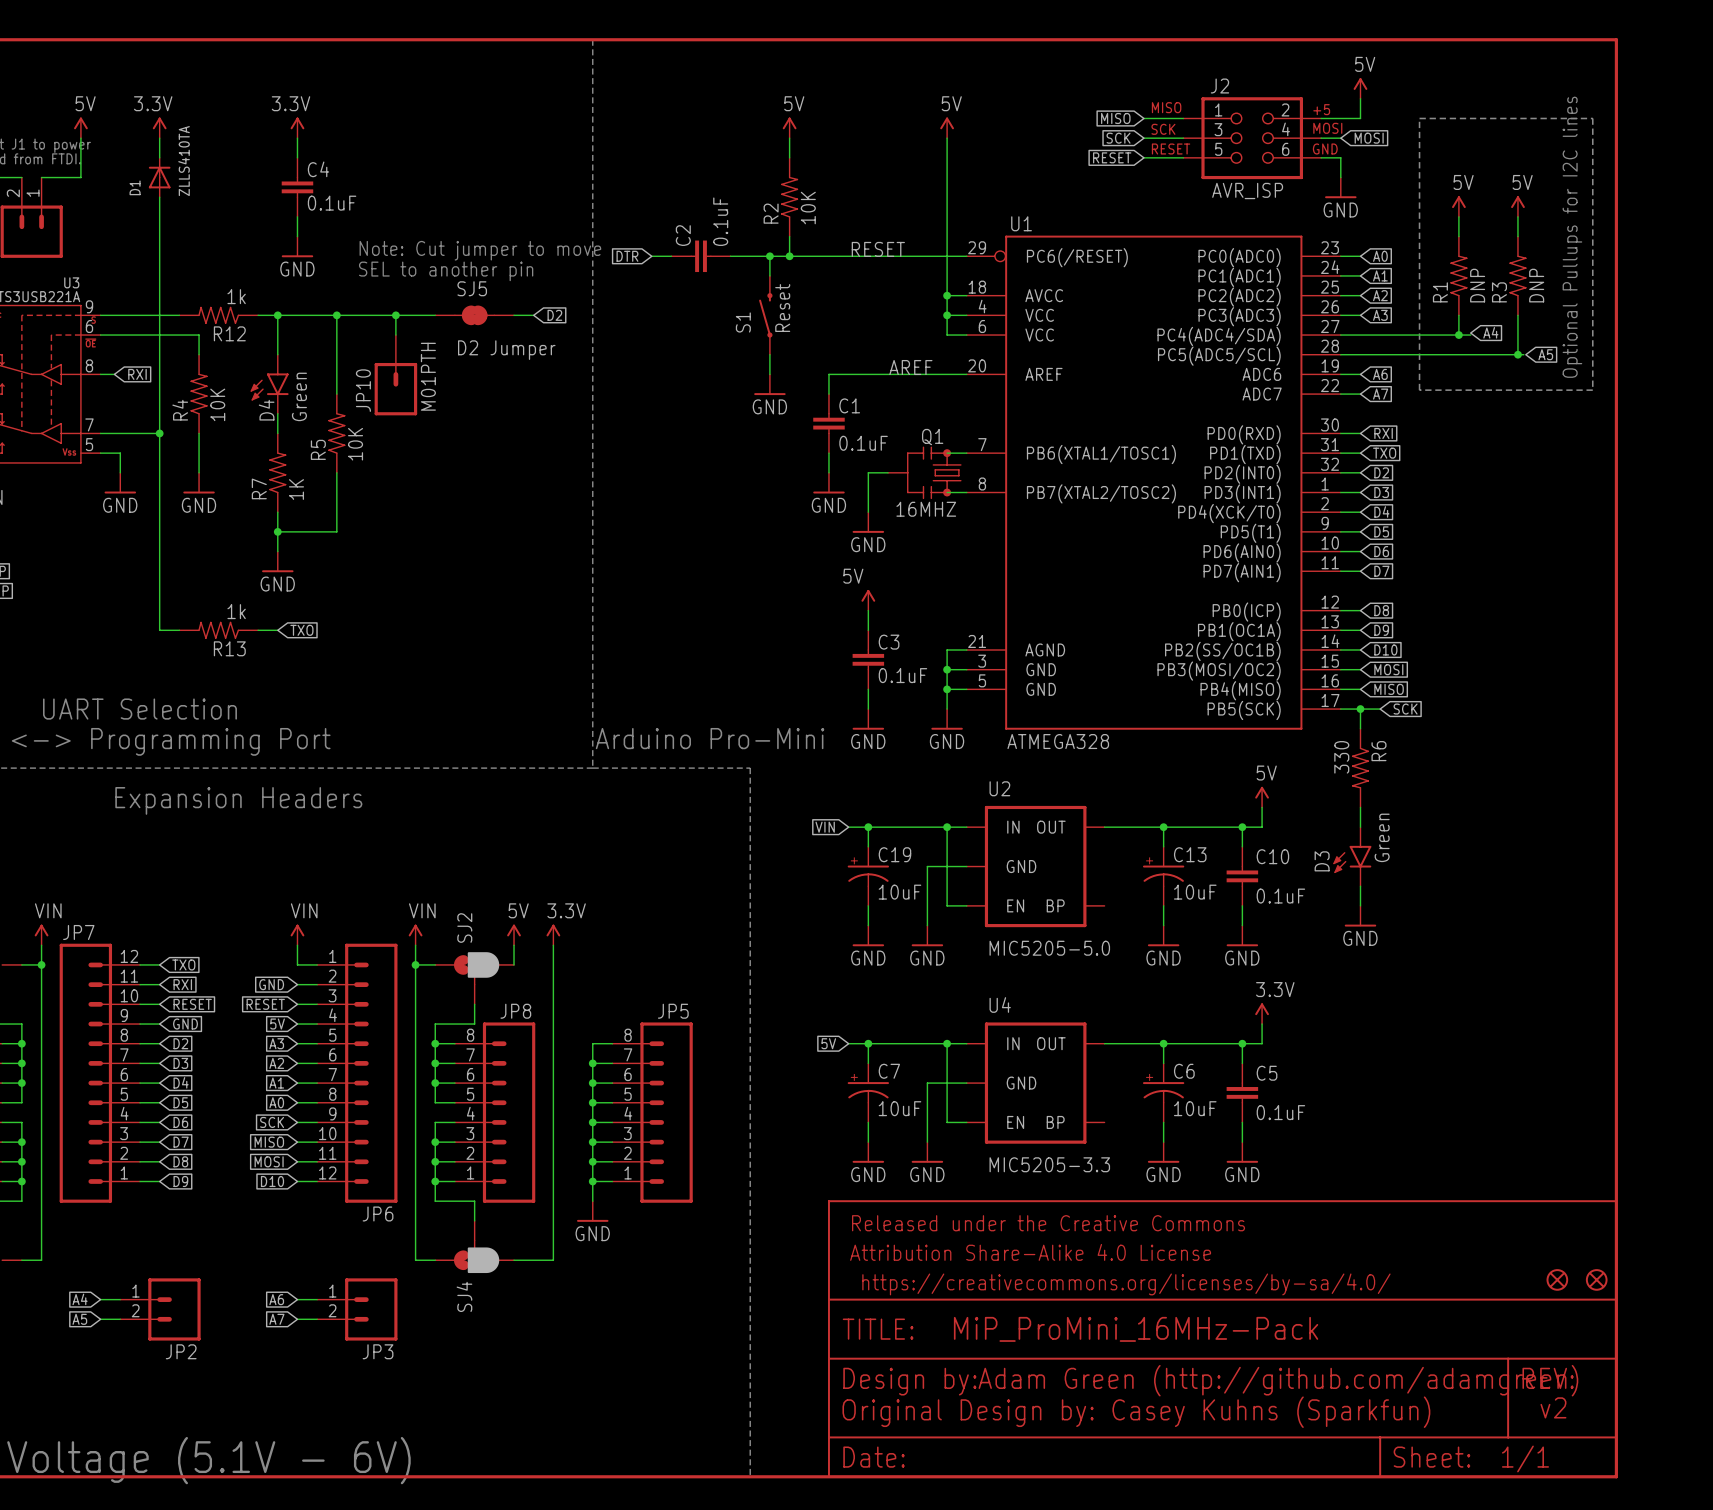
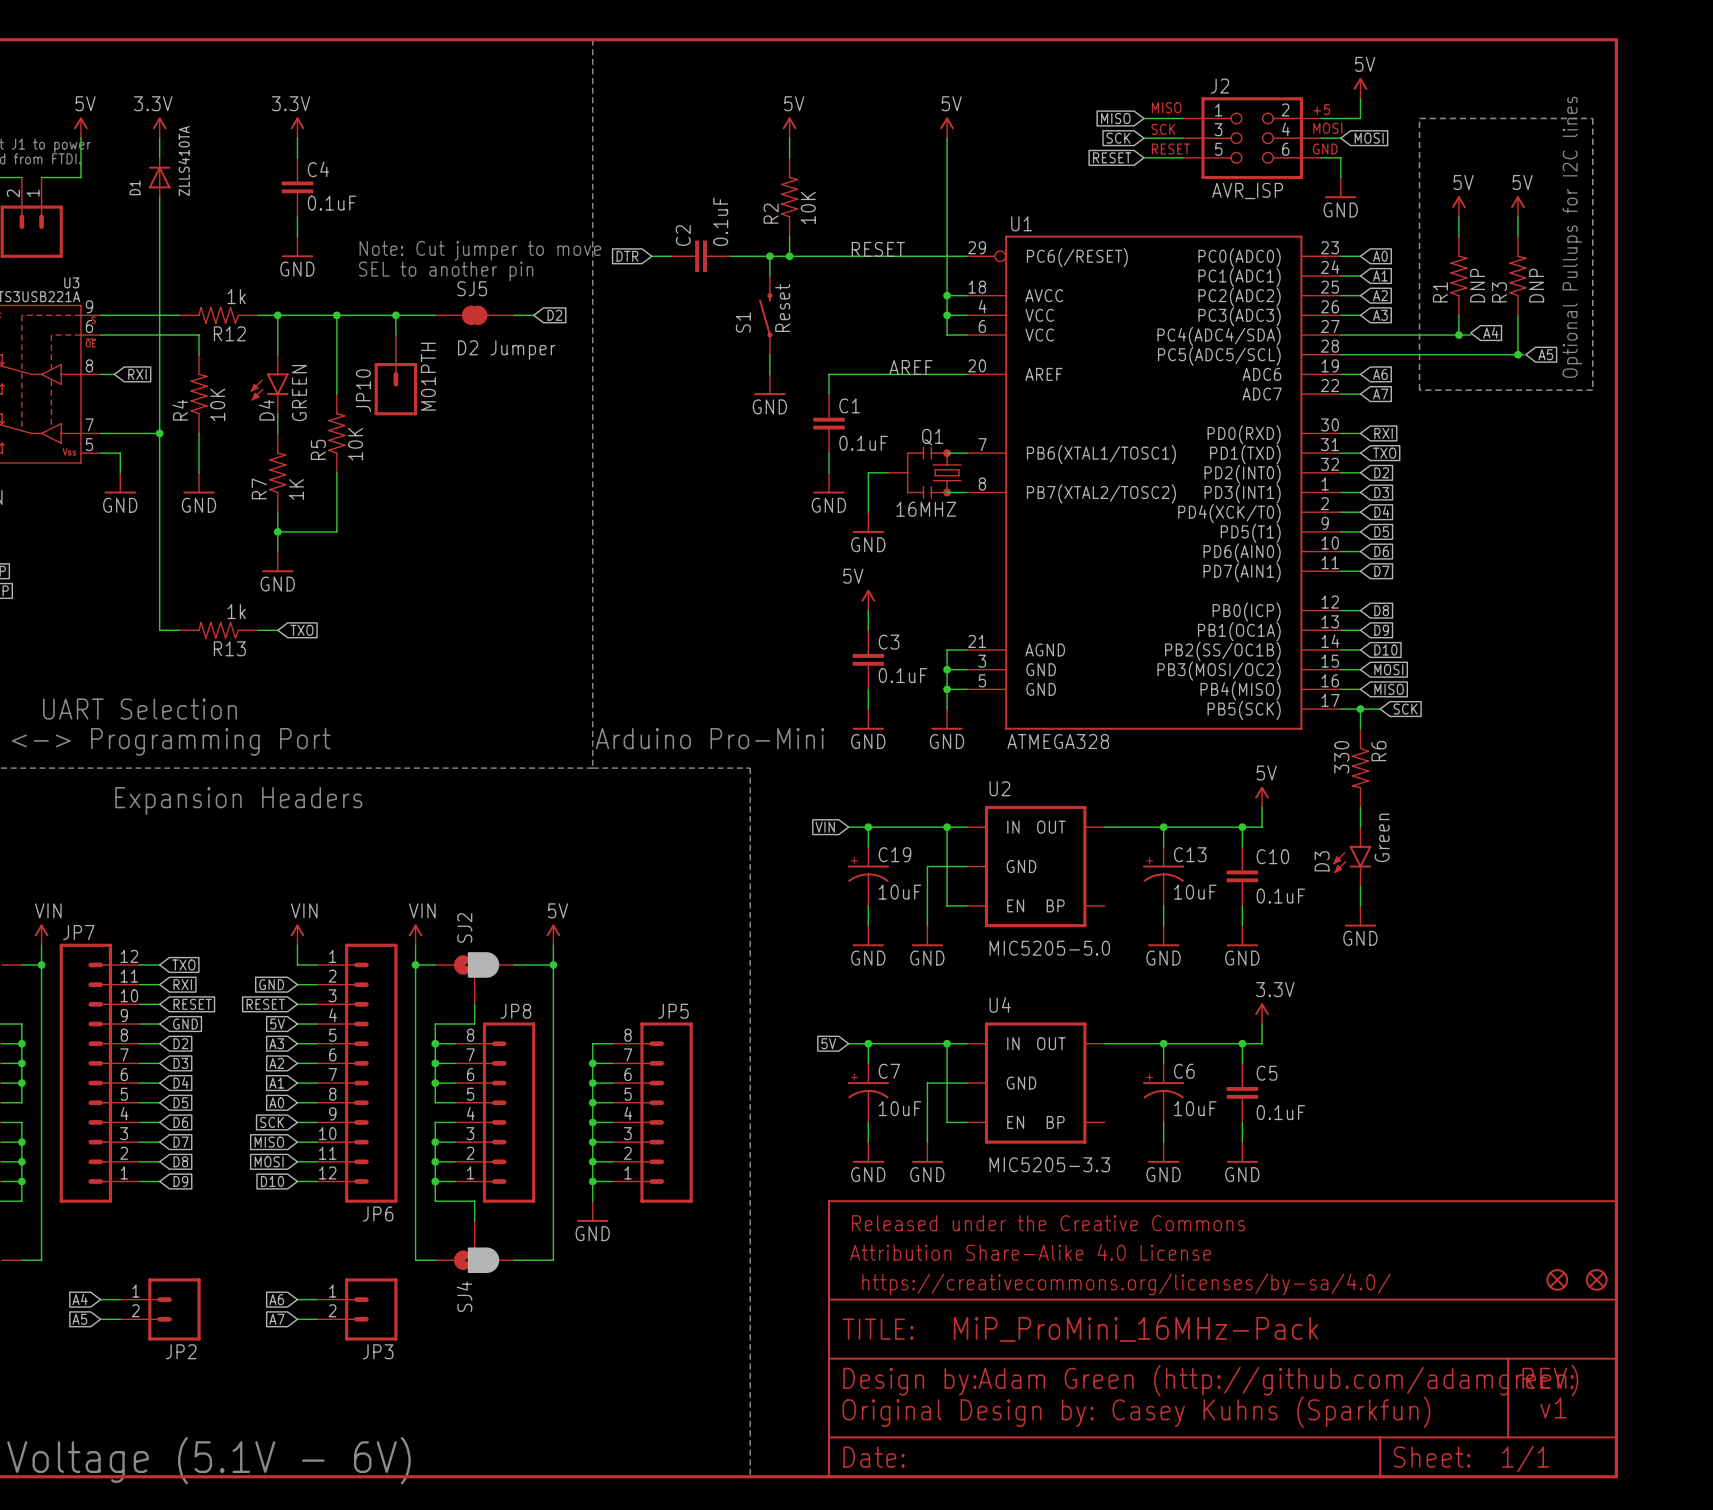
D4 value: Green (299, 396) -> GREEN (299, 393)
power symbol: 5V (514, 934) -> none
power symbol: 3.3V (553, 934) -> 5V (553, 934)
wire: (514, 945) (514, 964) -> (553, 964) (514, 964)
junction: none -> (553, 964)
text: v2 (1553, 1407) -> v1 (1553, 1407)

